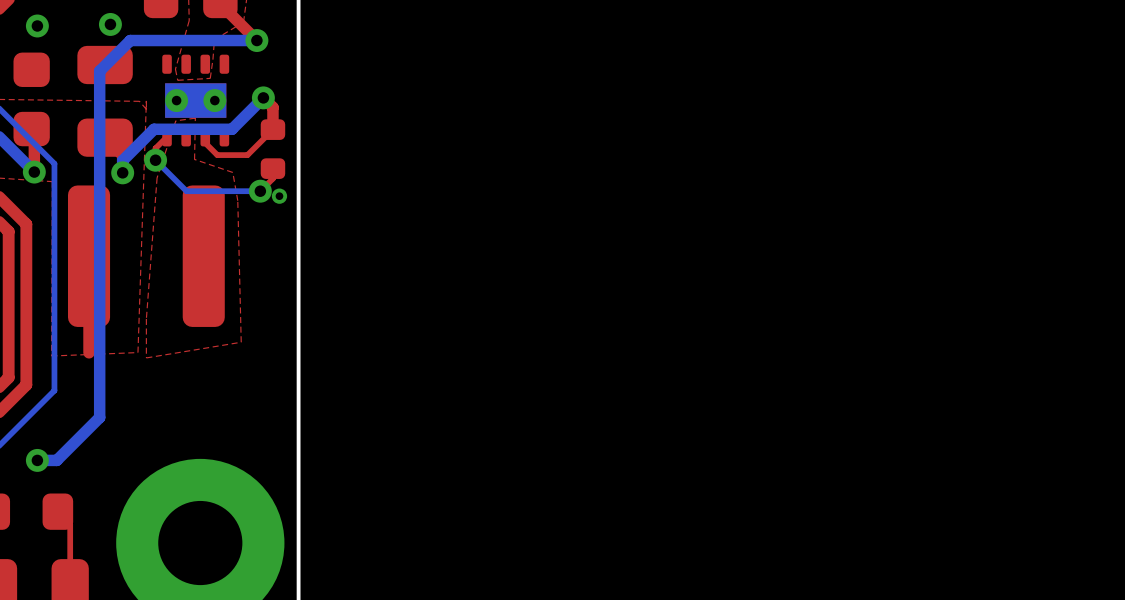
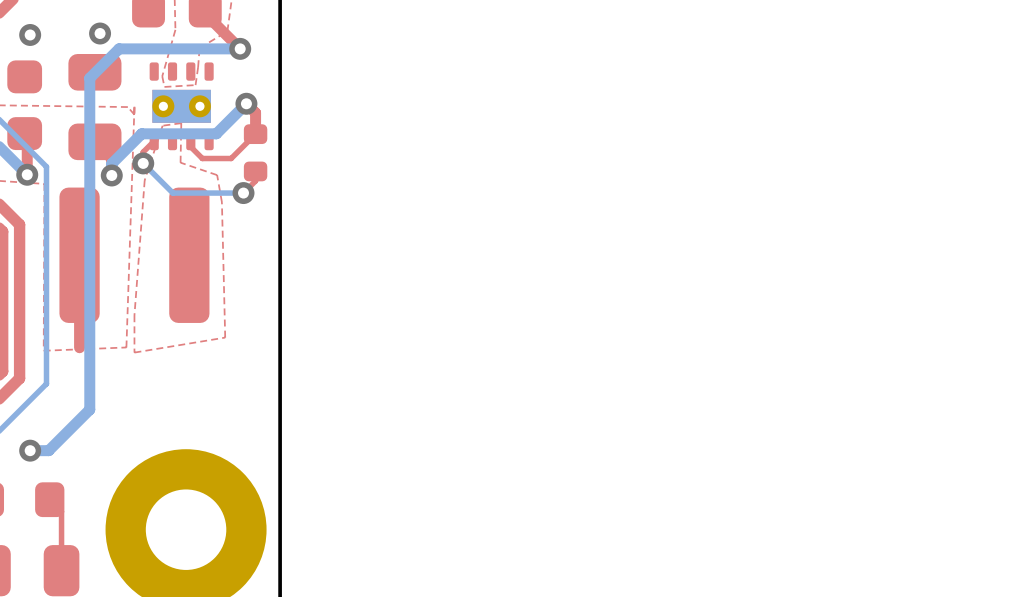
via: (279, 196) -> none

